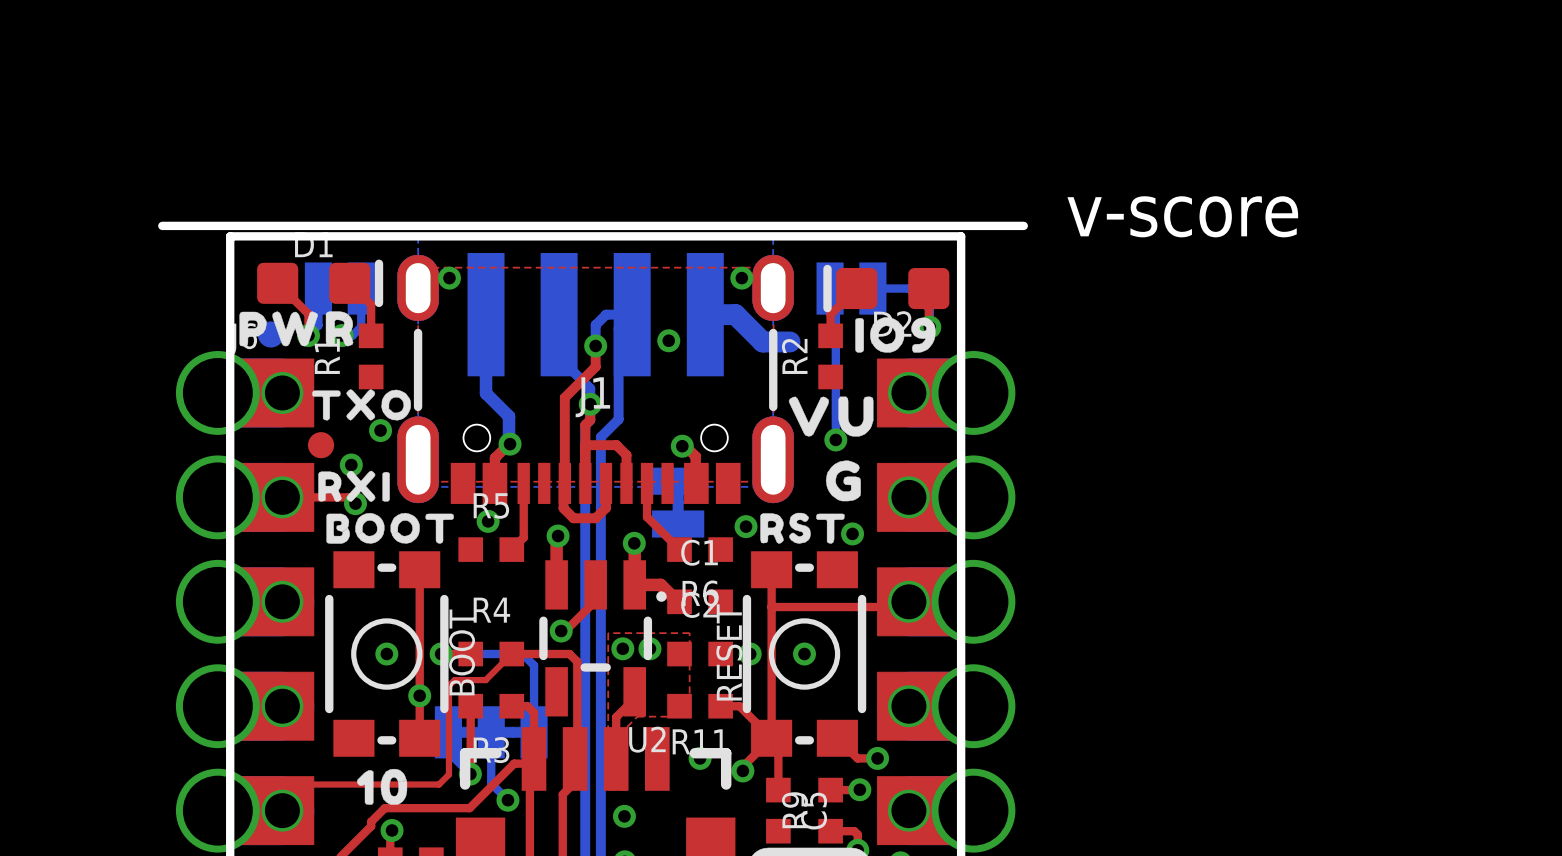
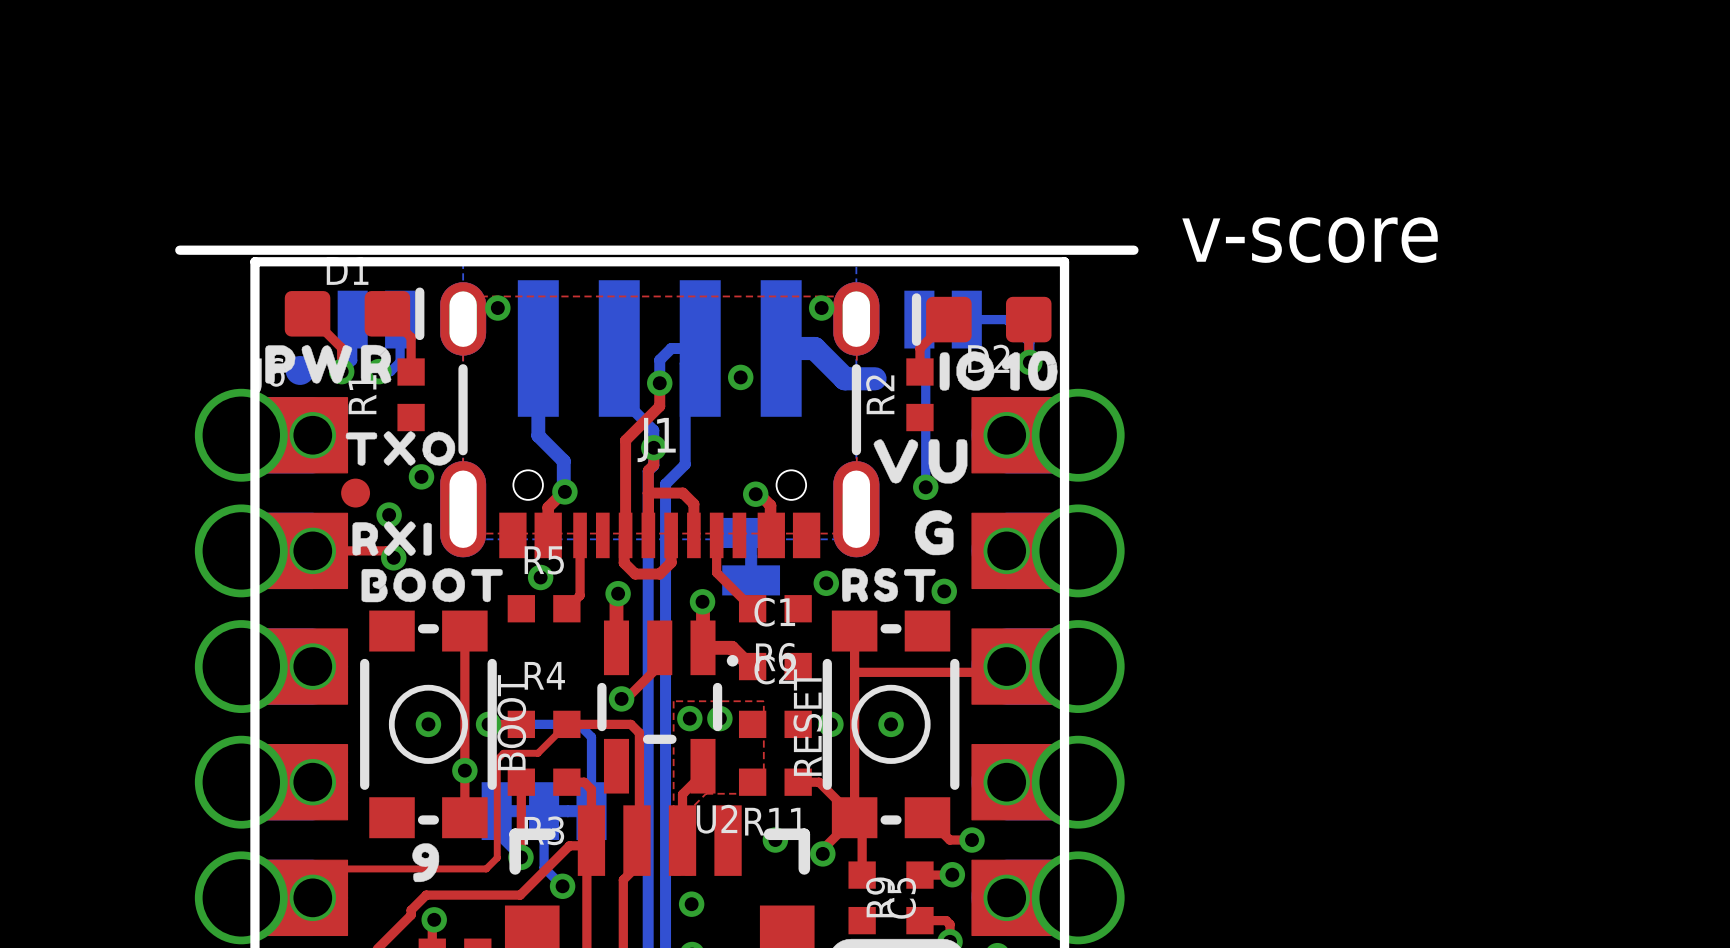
drawing shape: [855, 317, 936, 353] -> [939, 350, 1058, 391]
drawing shape: [356, 768, 408, 805] -> [412, 843, 440, 883]

